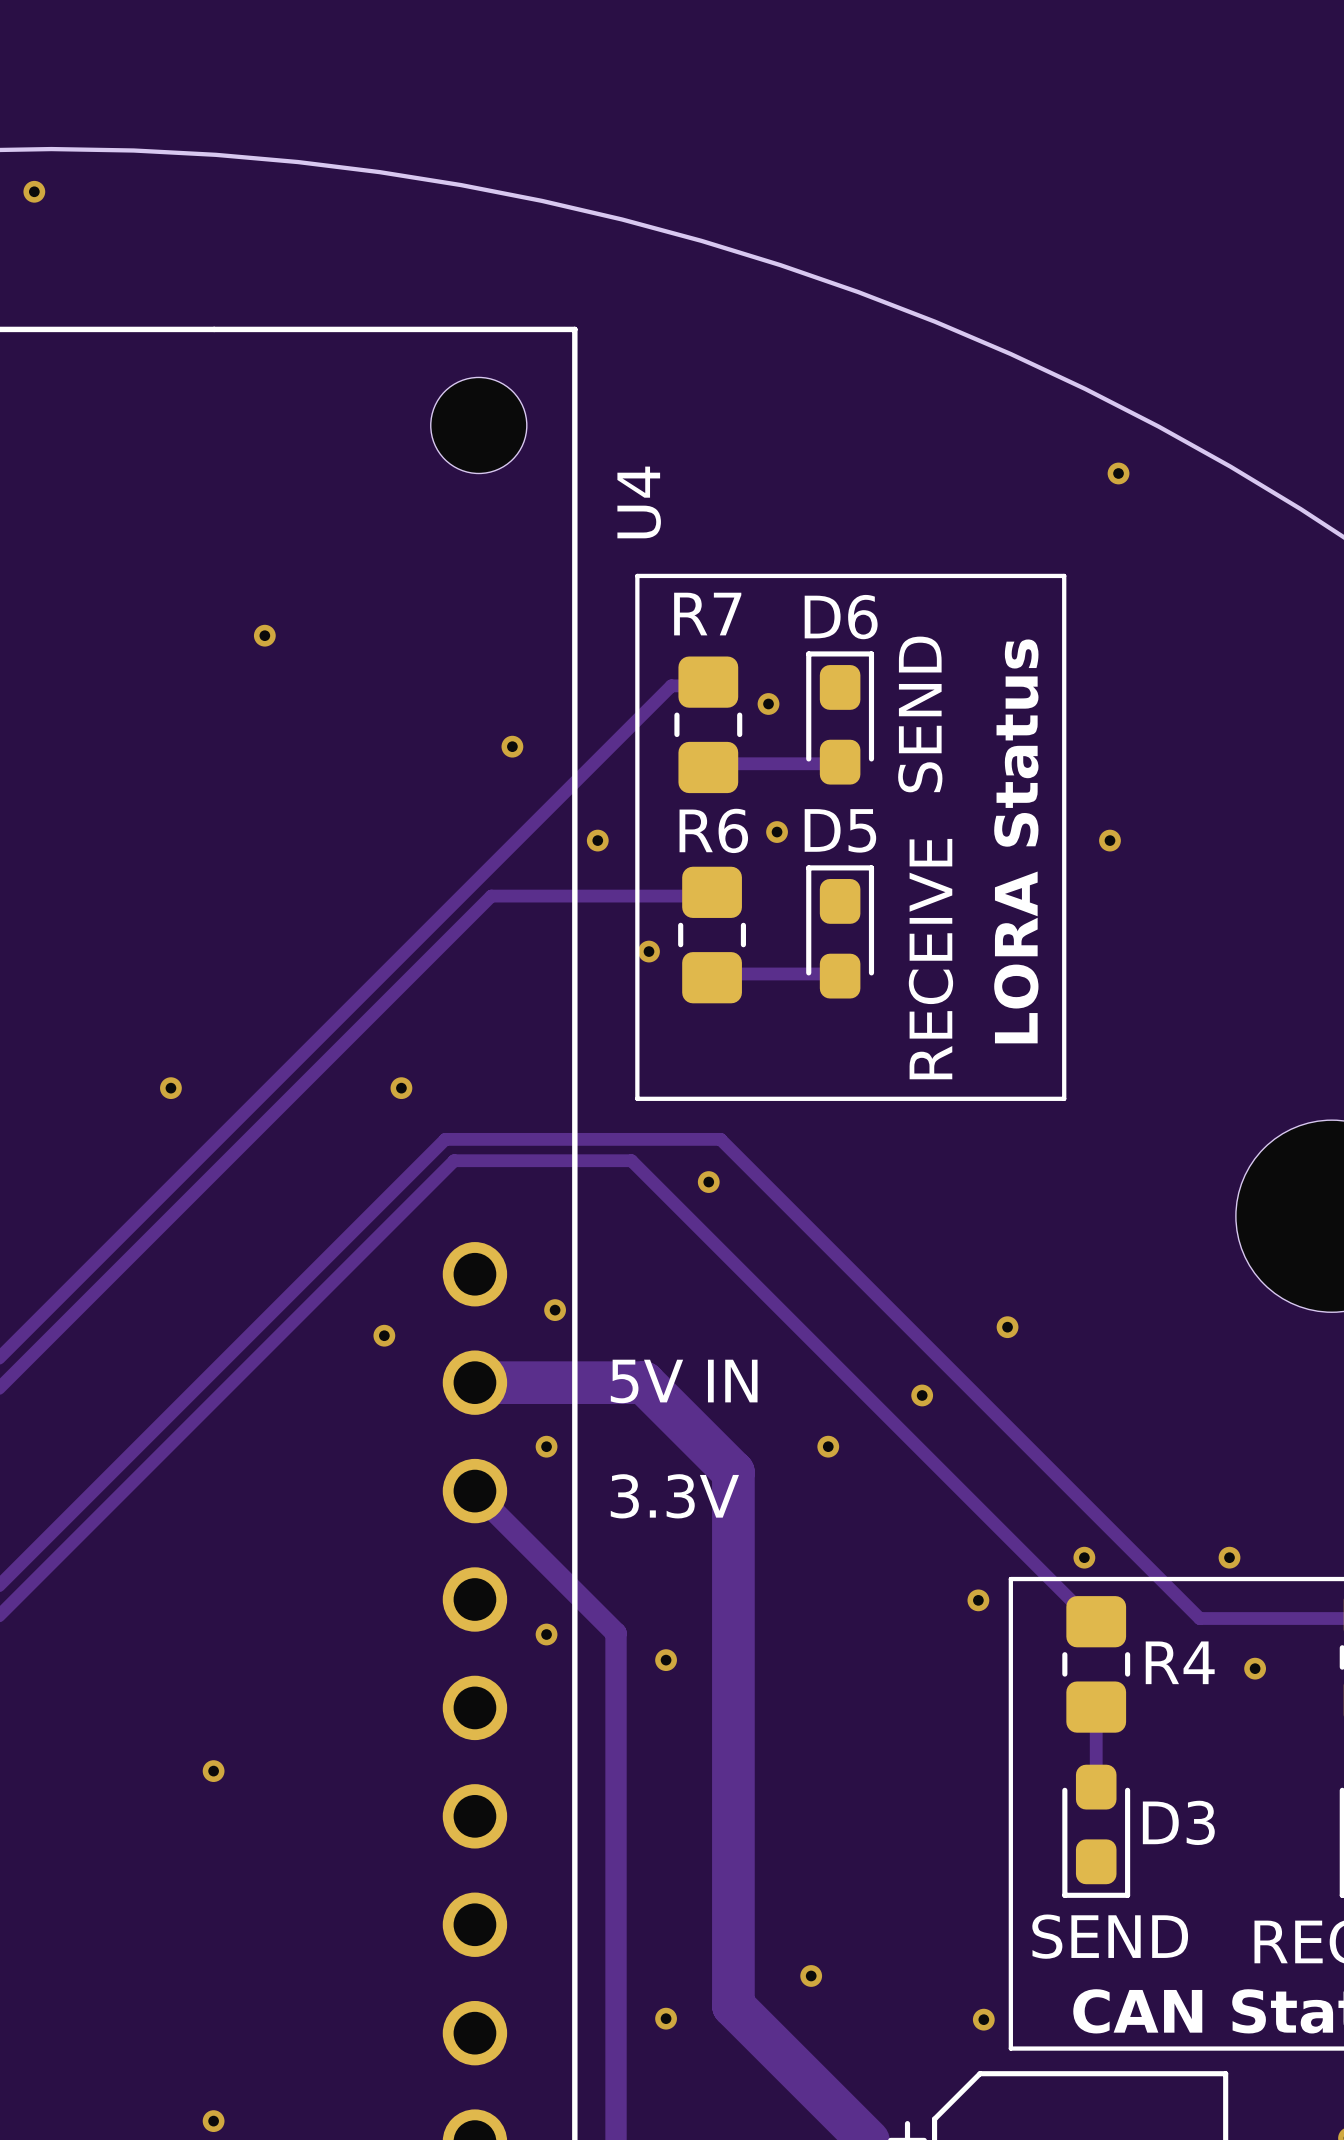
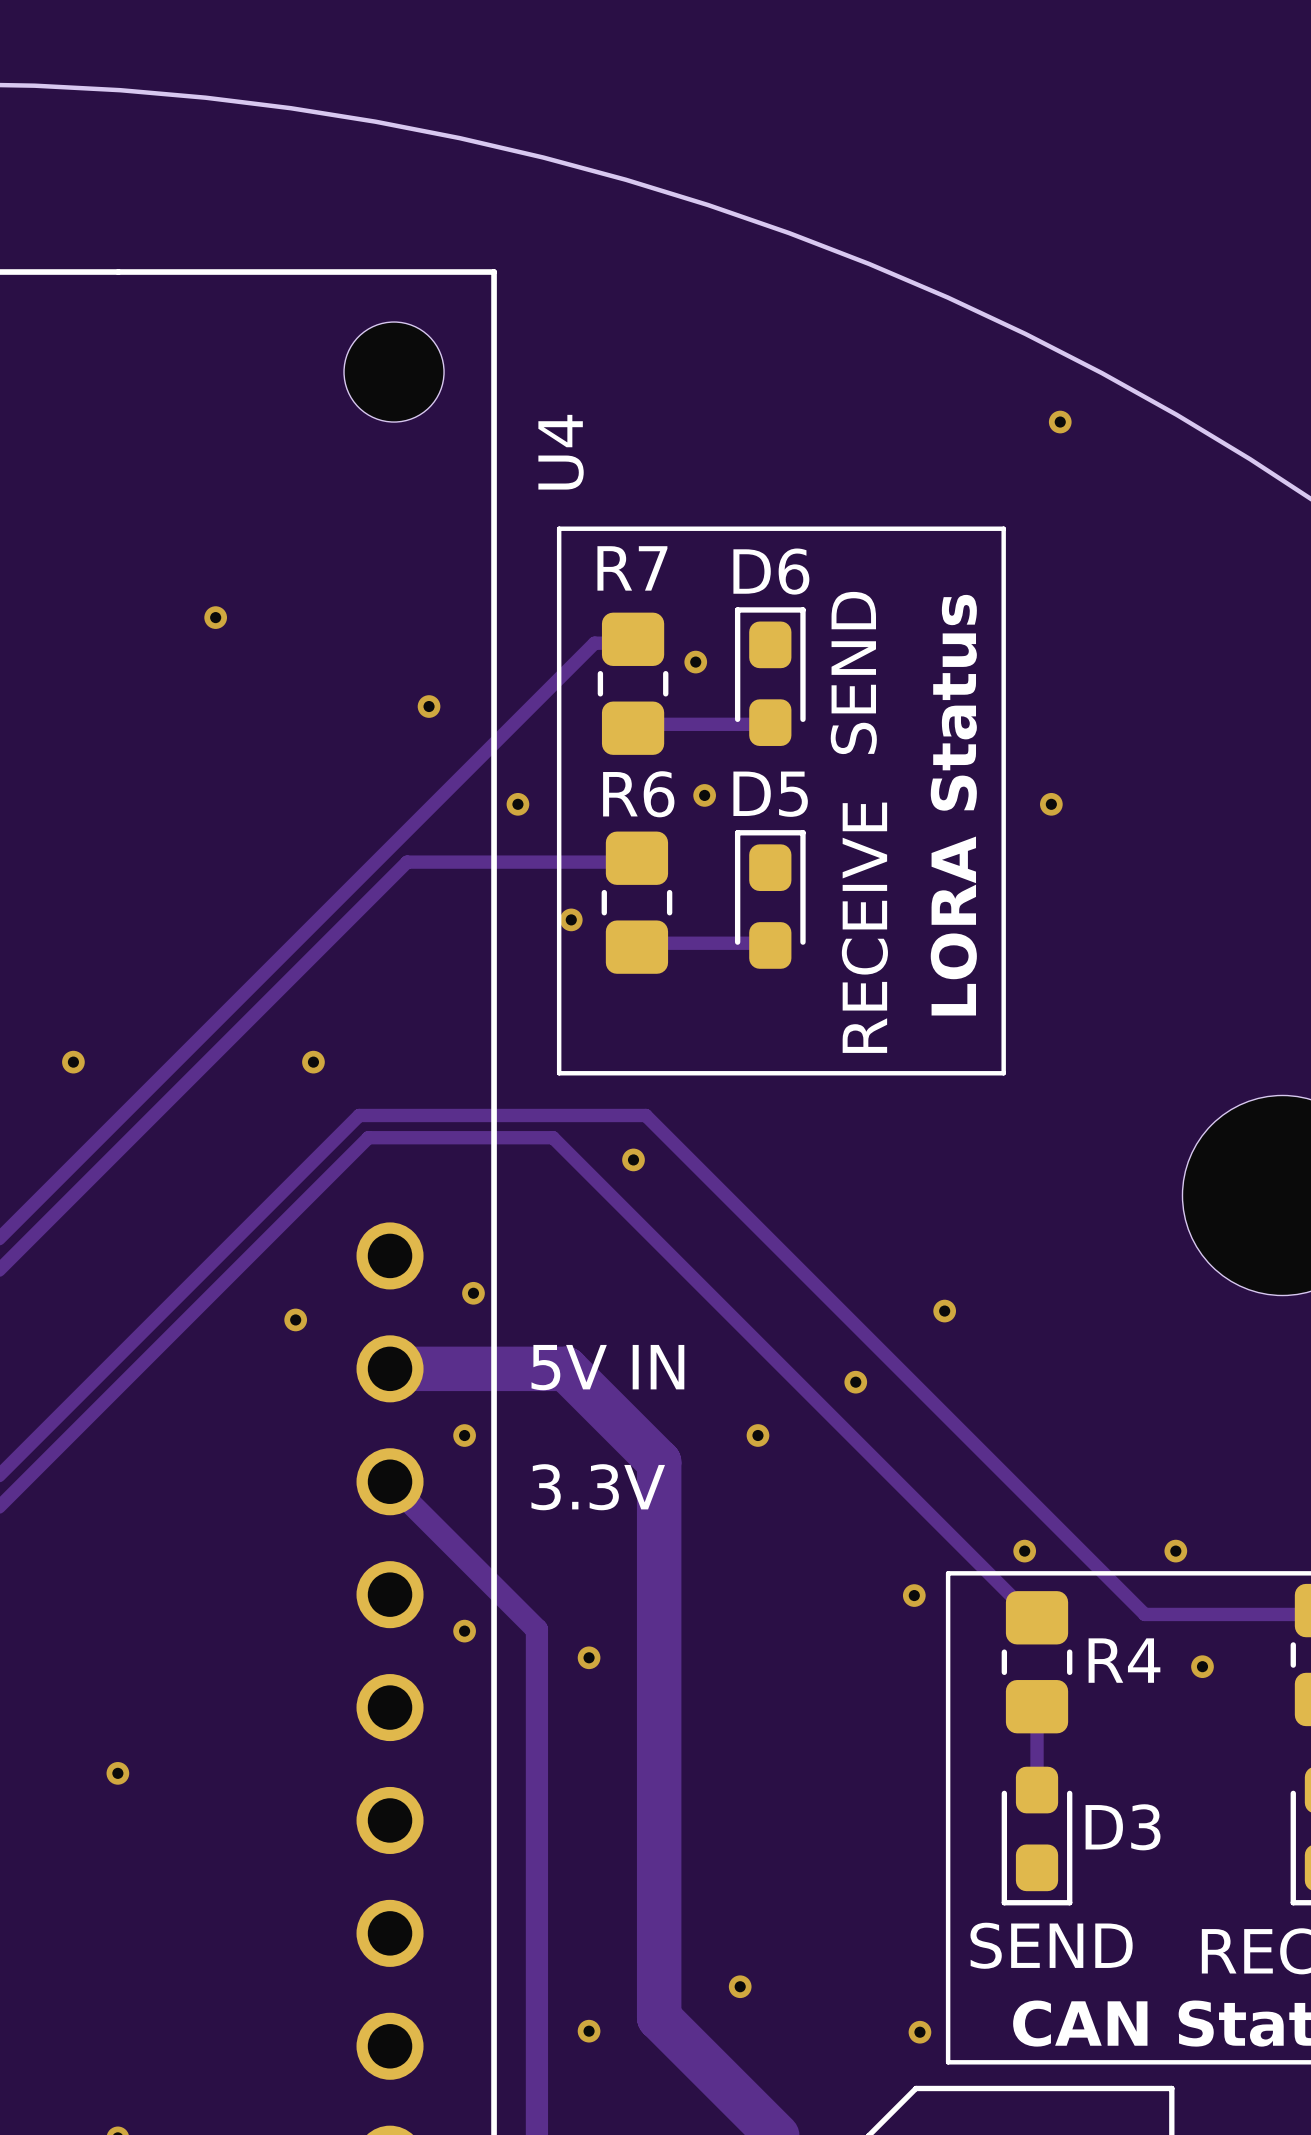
via position: (264, 635) -> (215, 617)

